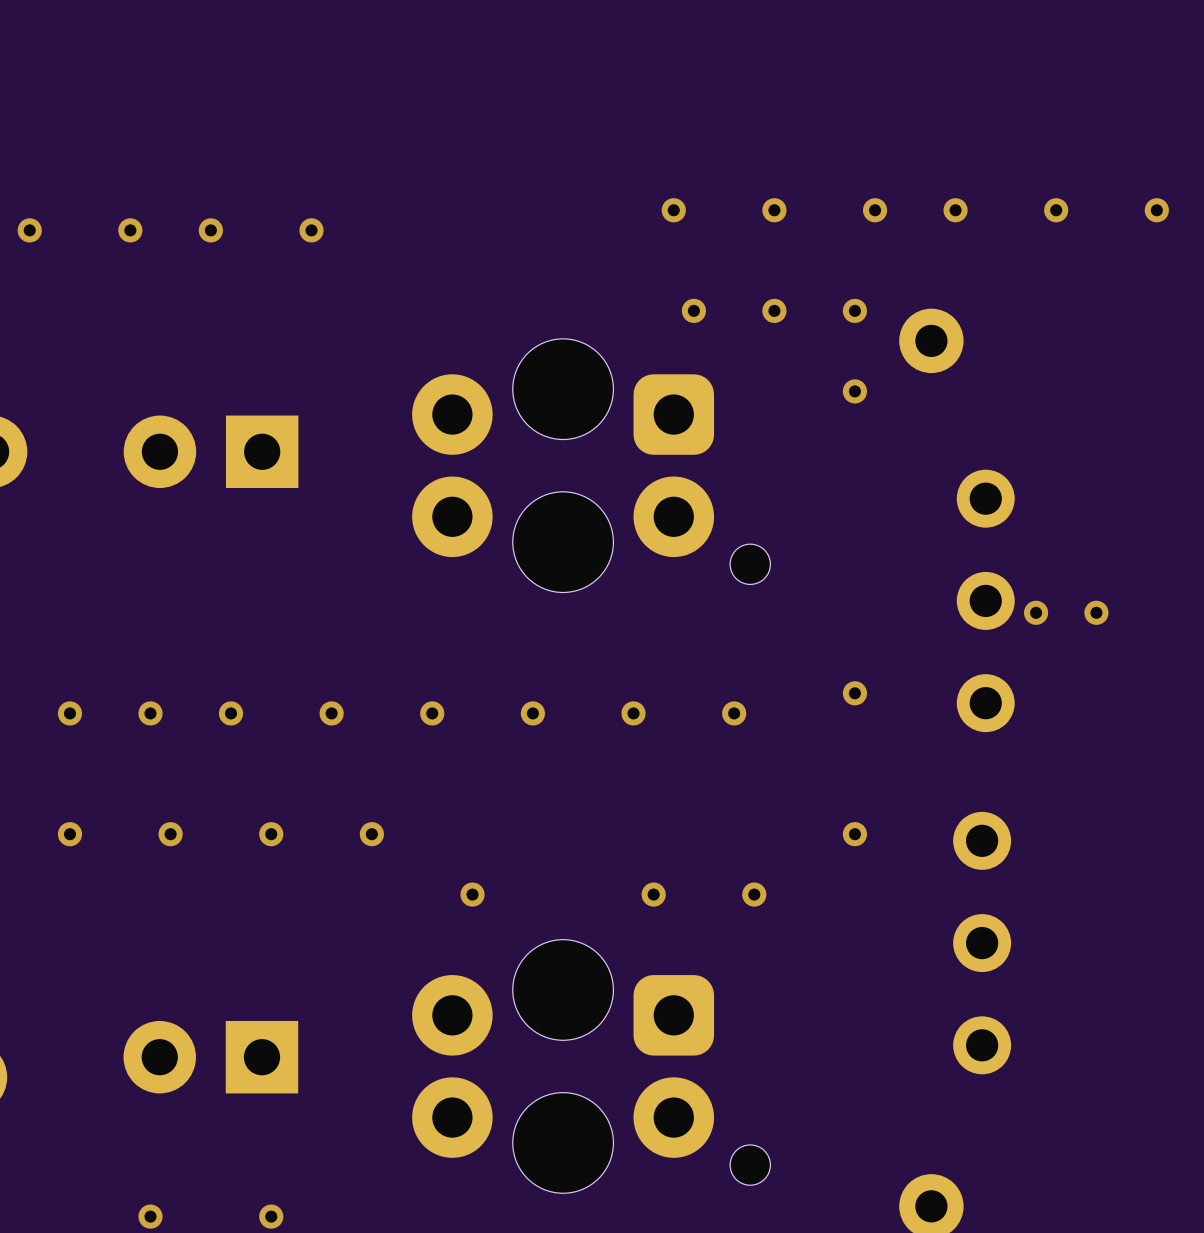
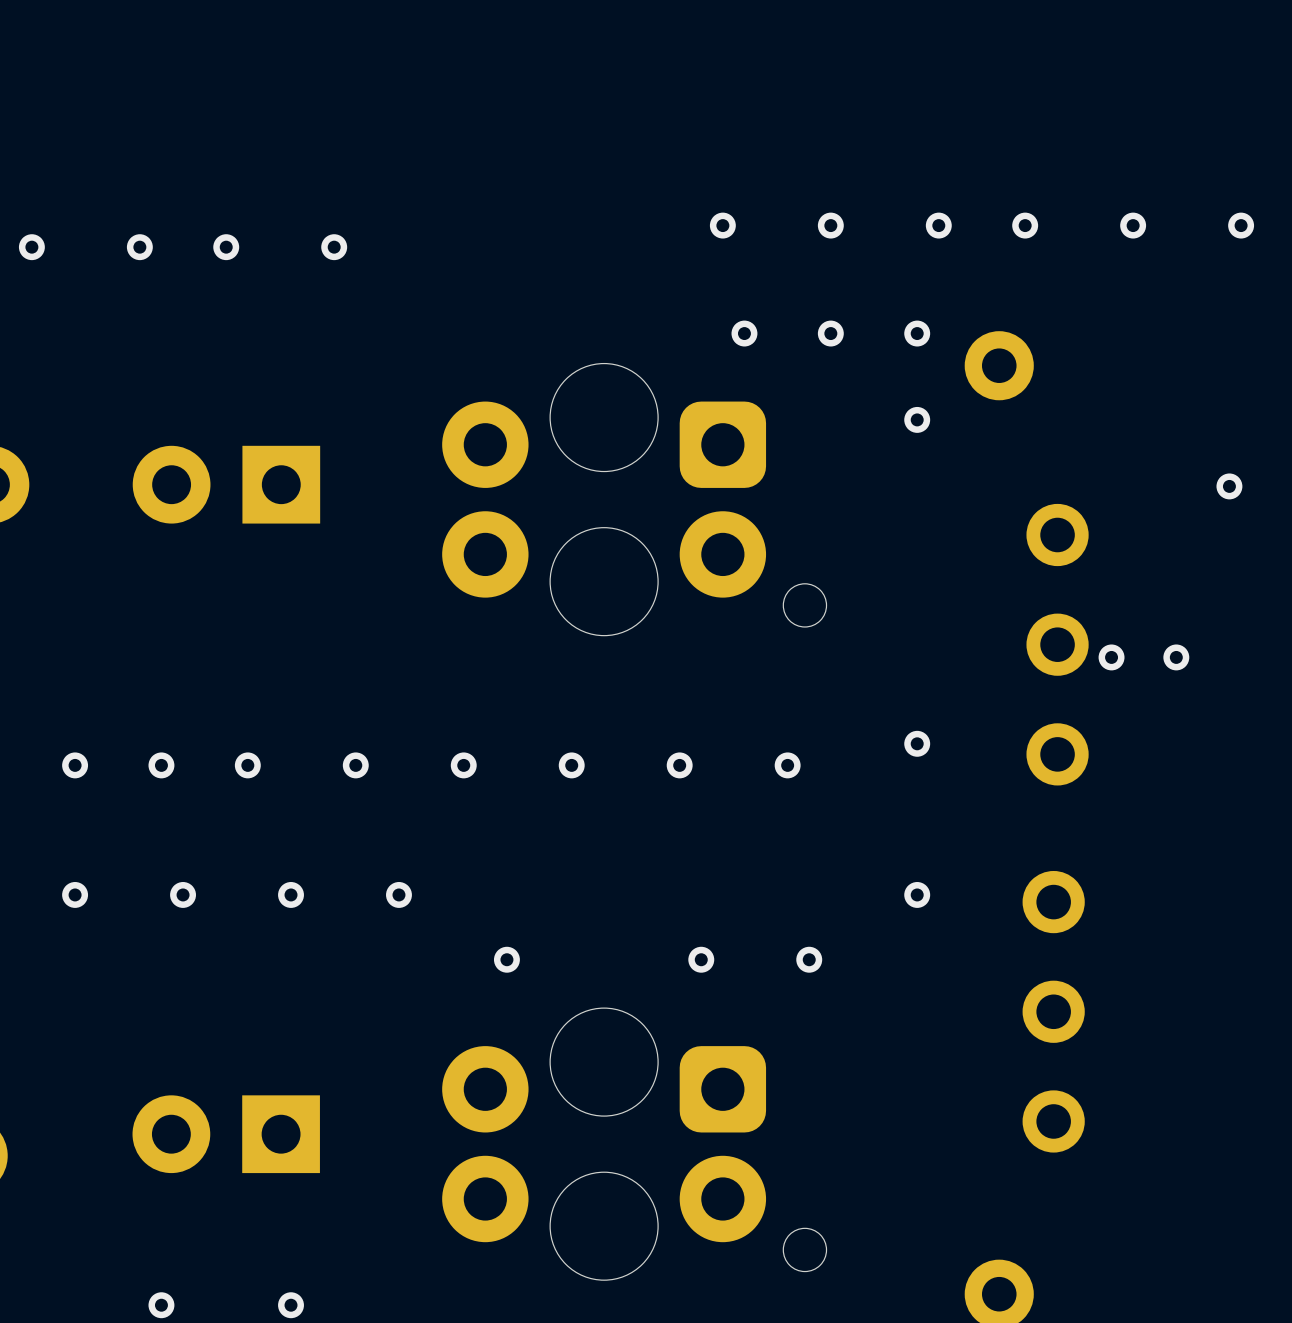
via: none -> (1229, 486)

